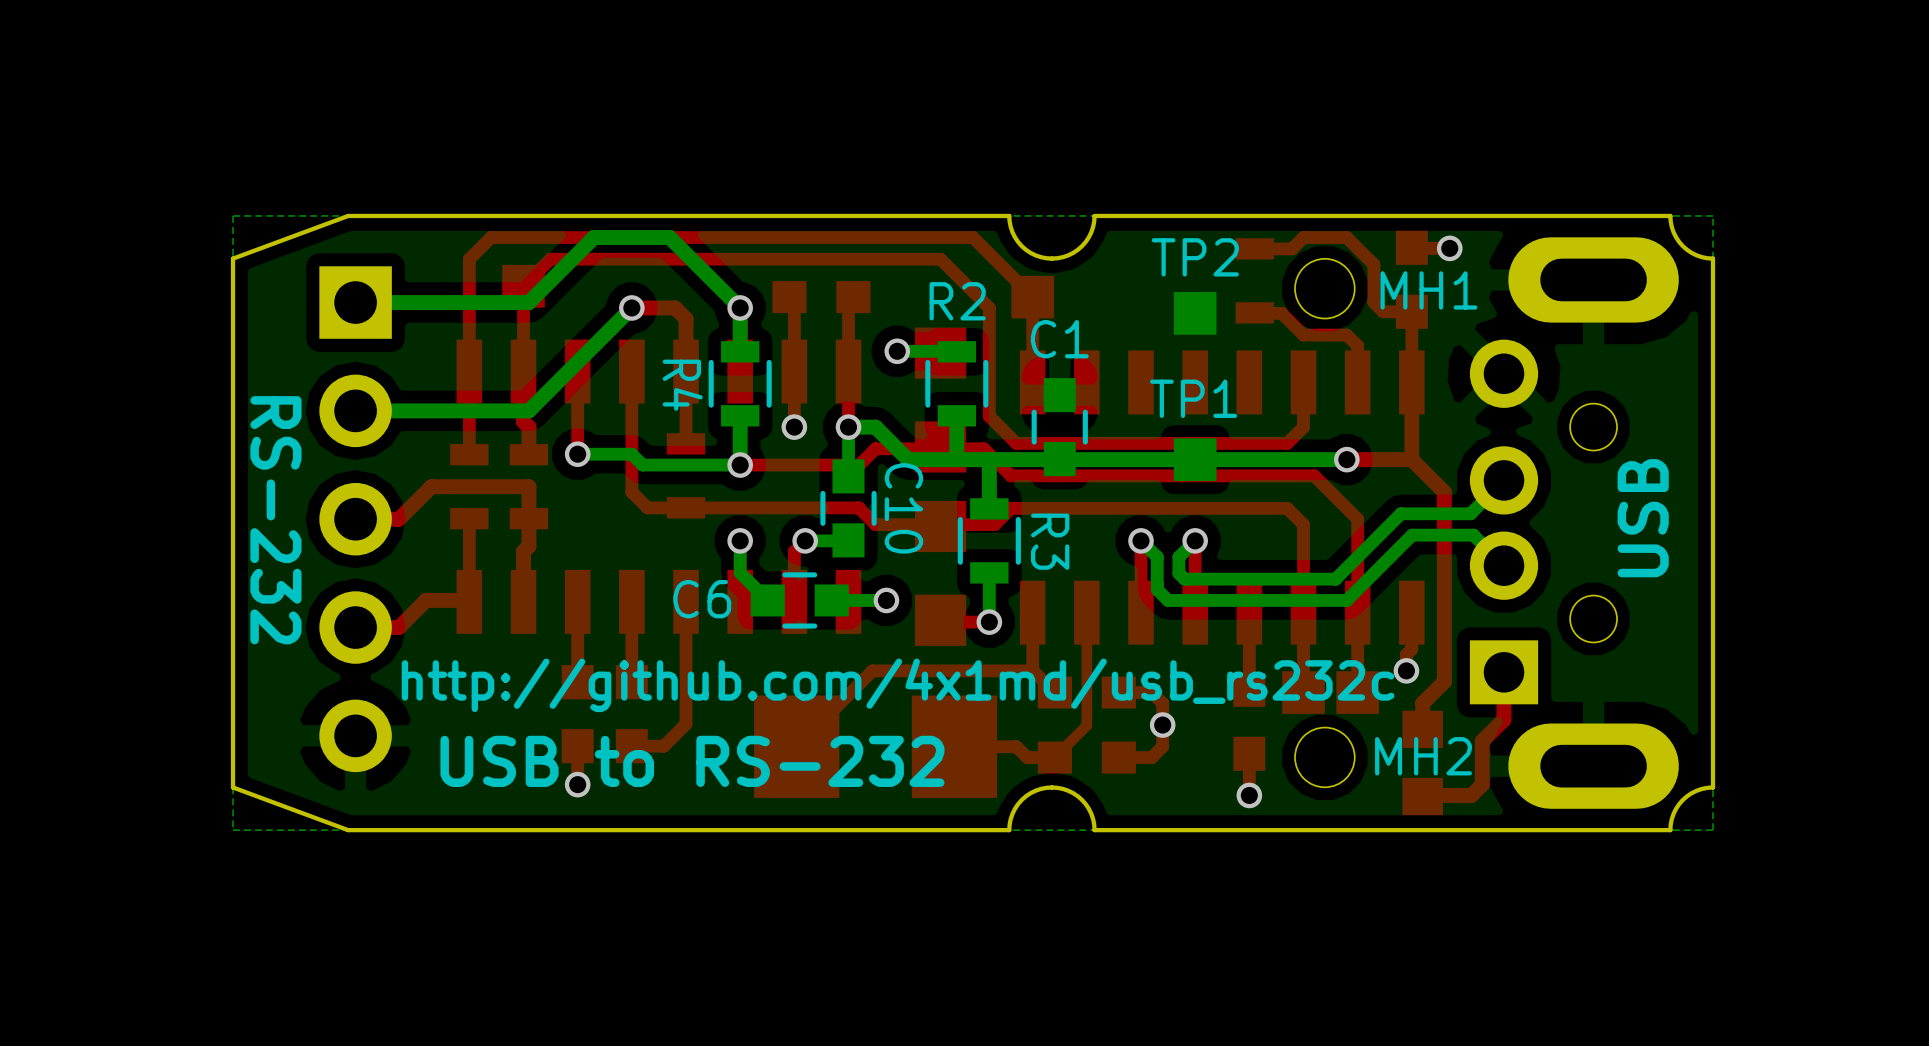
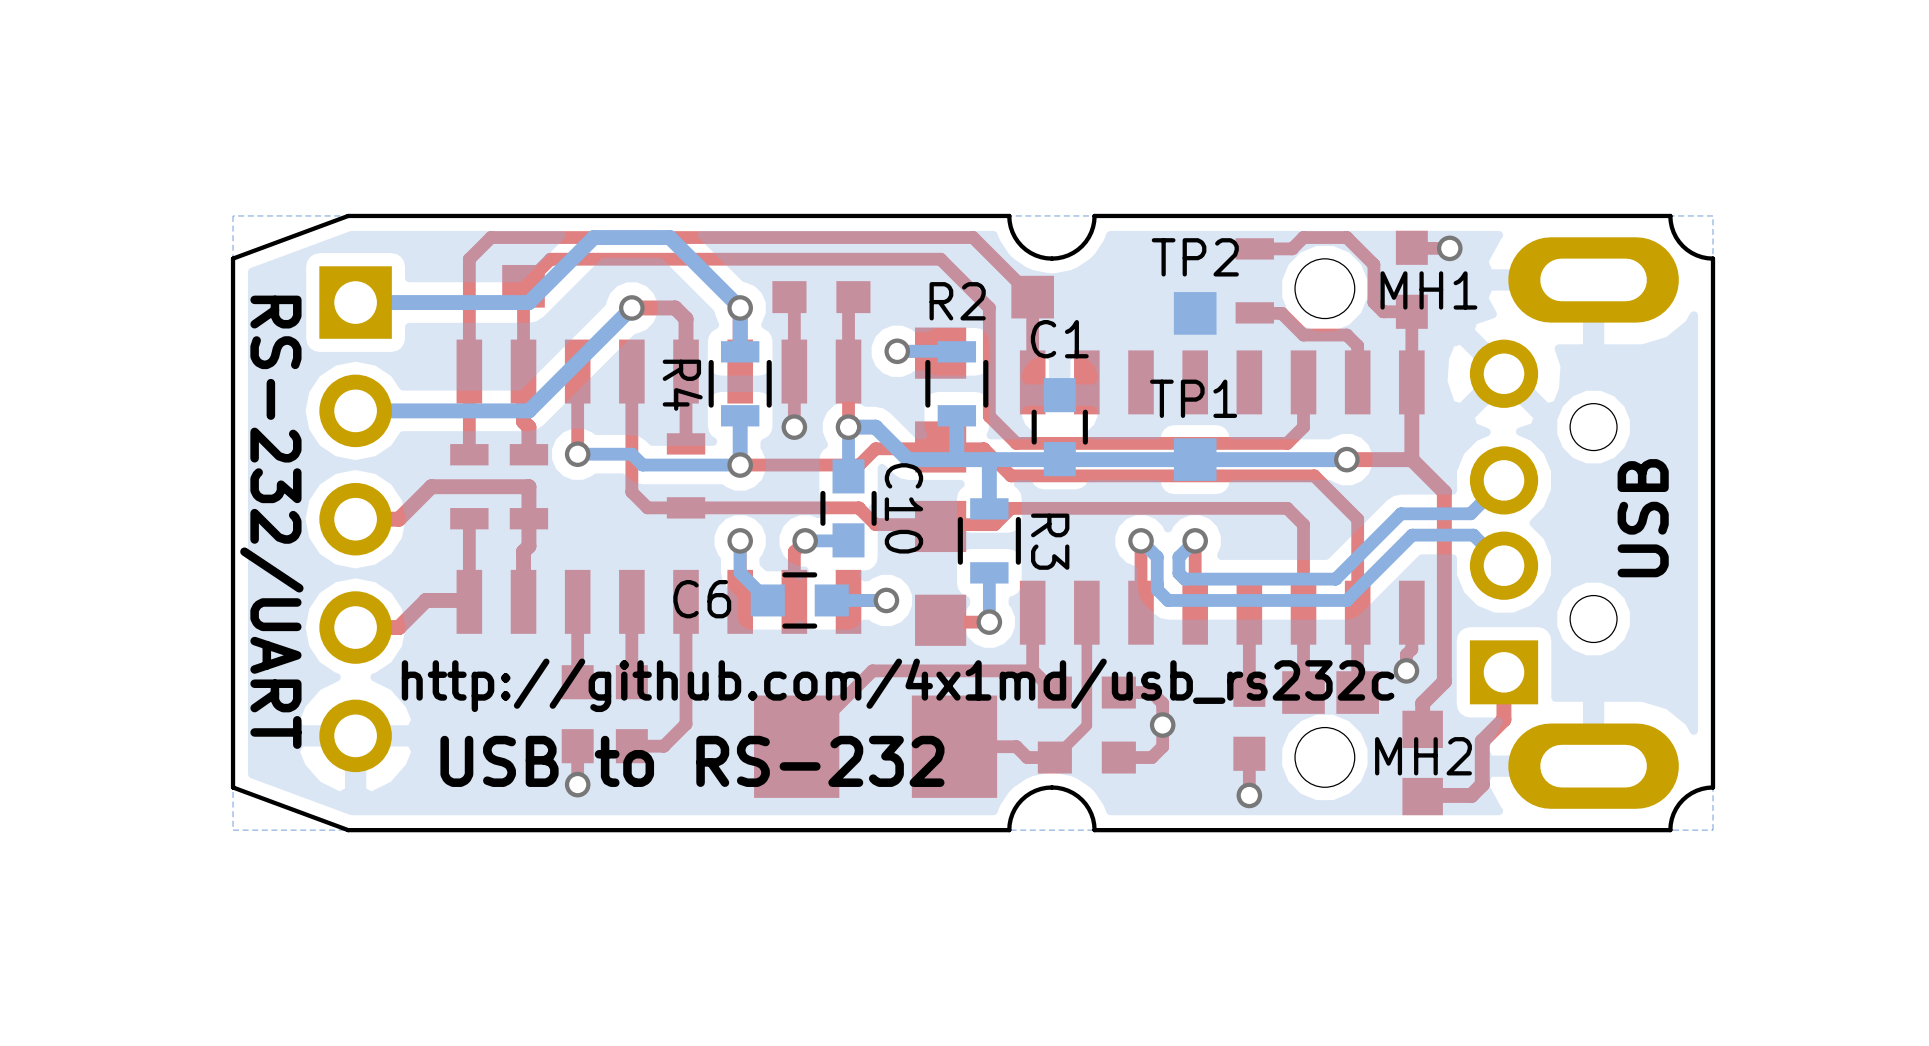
text: RS-232 (275, 520) -> RS-232/UART (271, 522)

